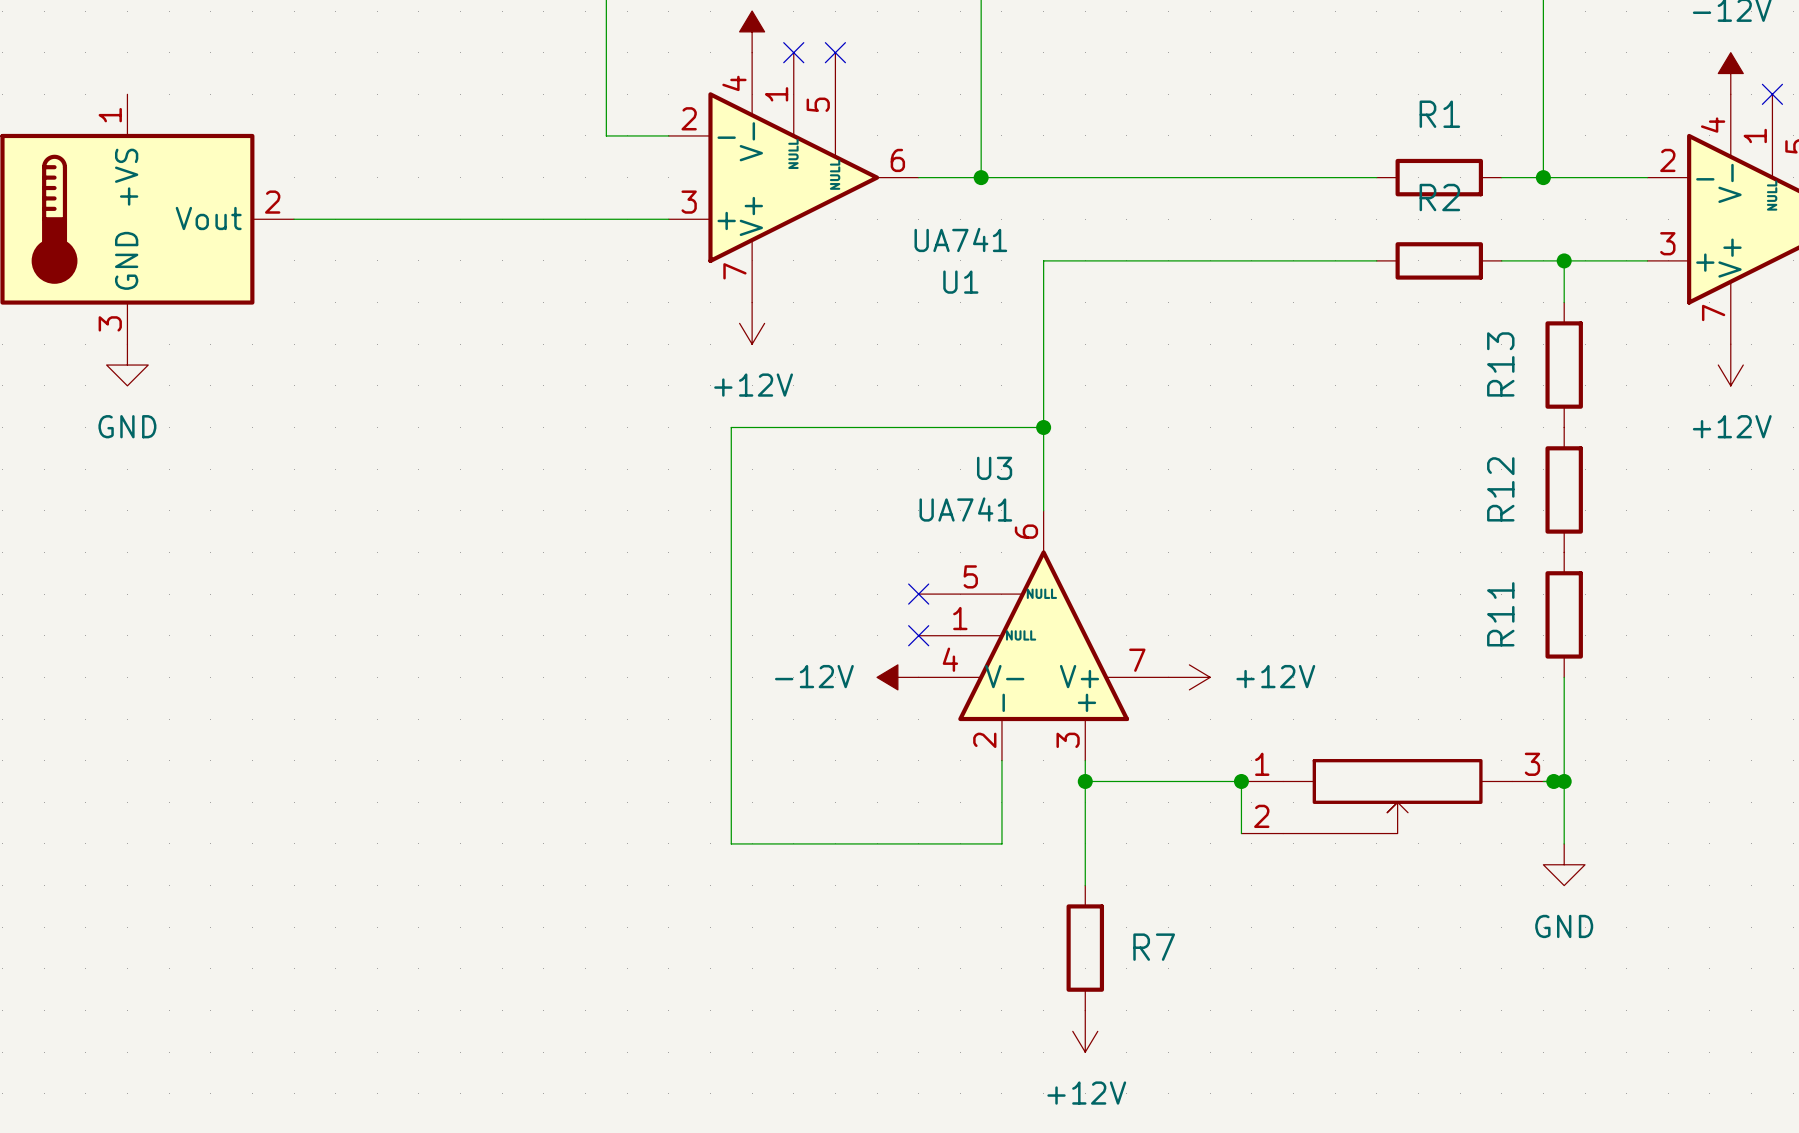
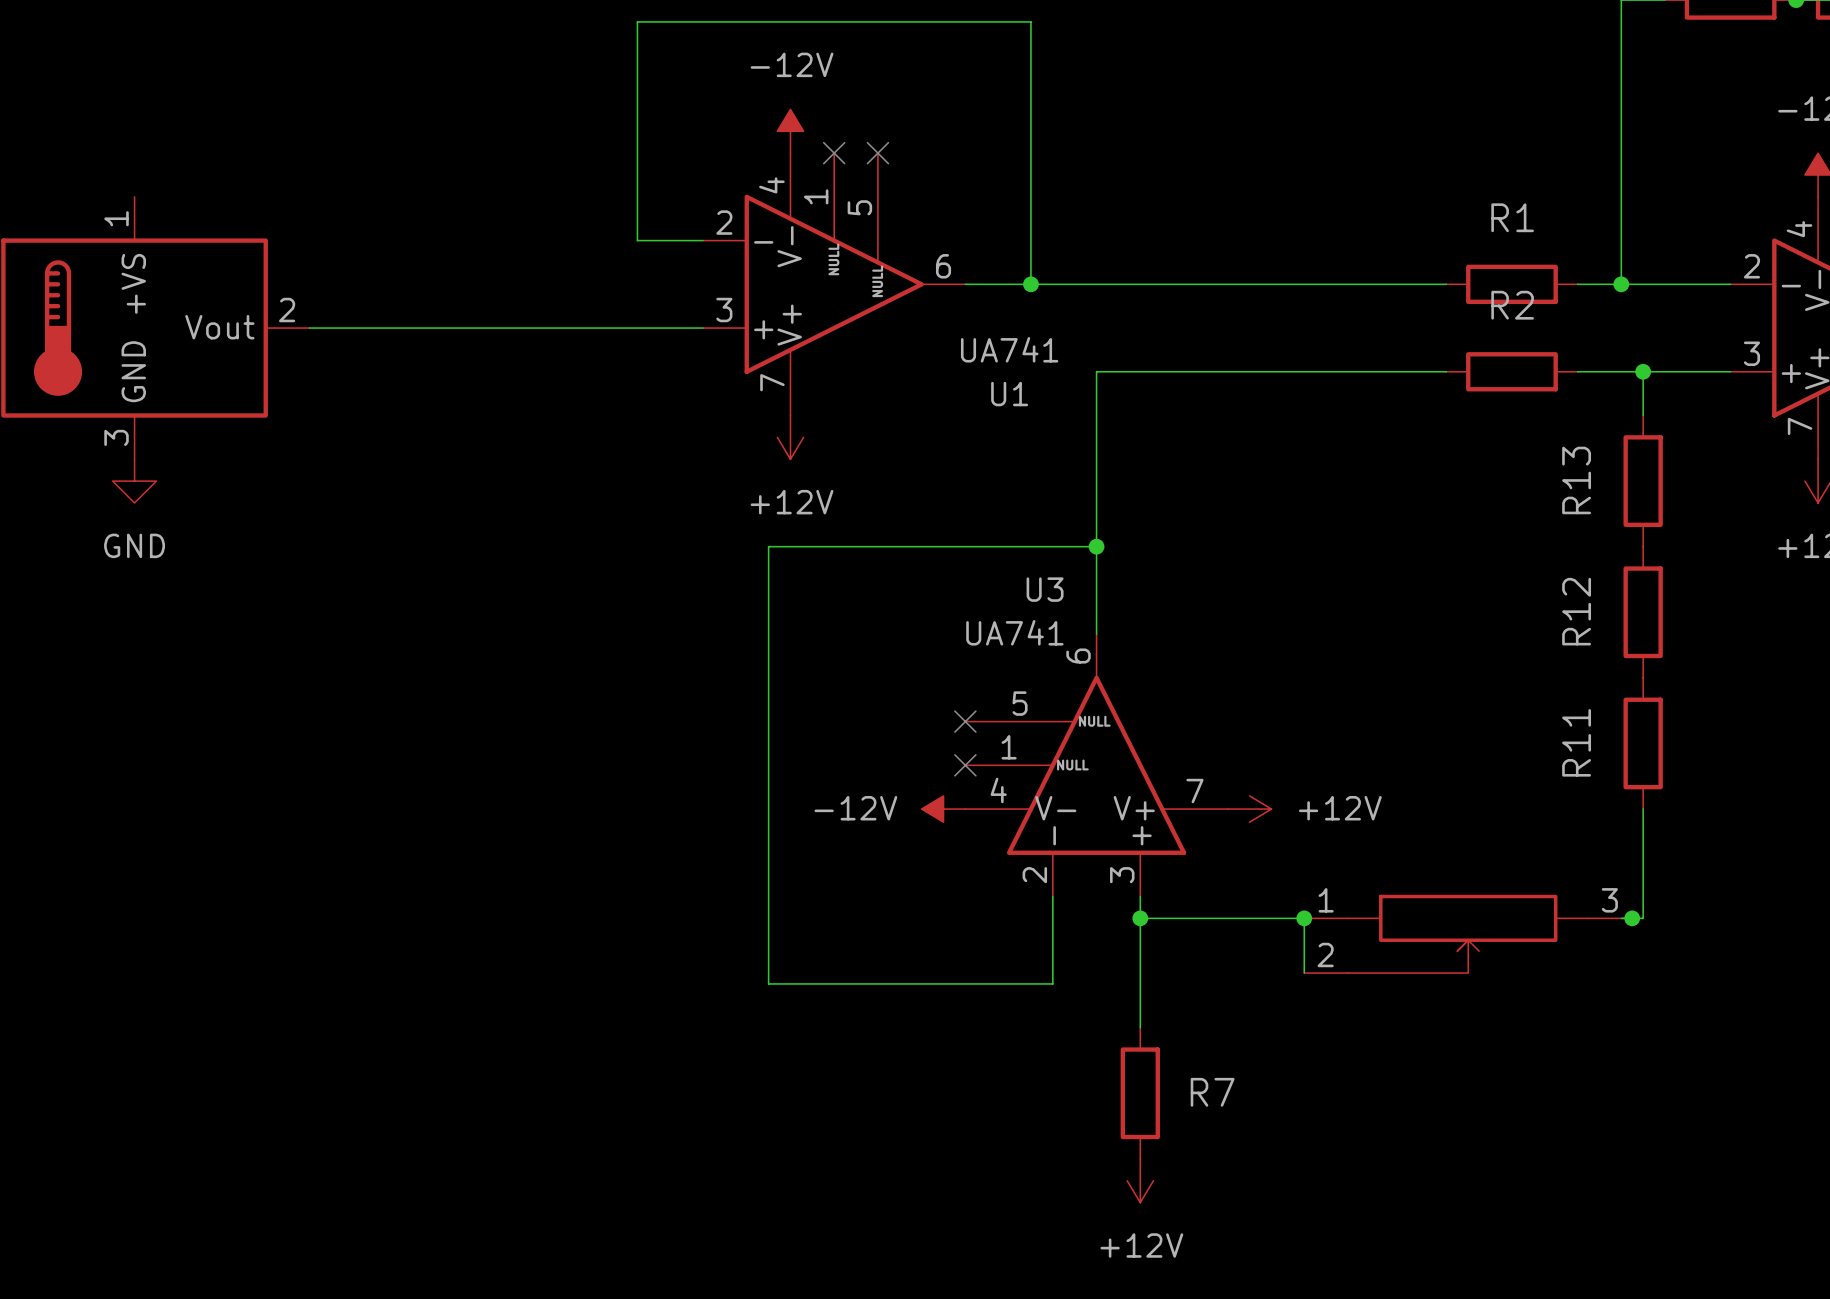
wire: (1564, 781) (1564, 843) -> none
junction: (1564, 781) -> none
power symbol: GND (1564, 864) -> none

